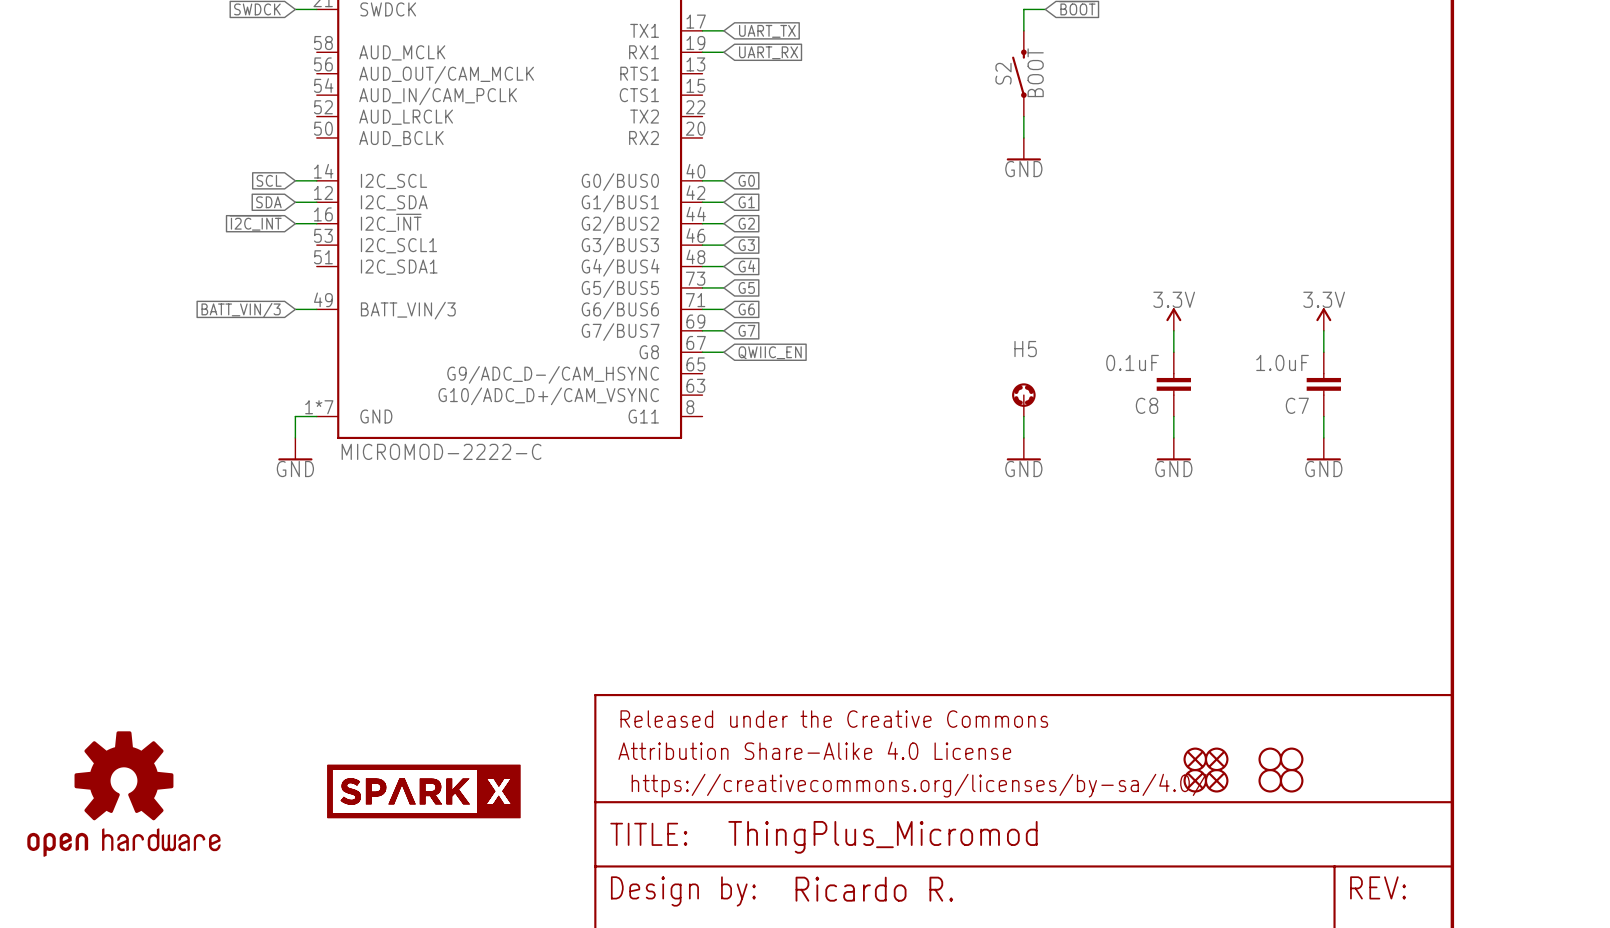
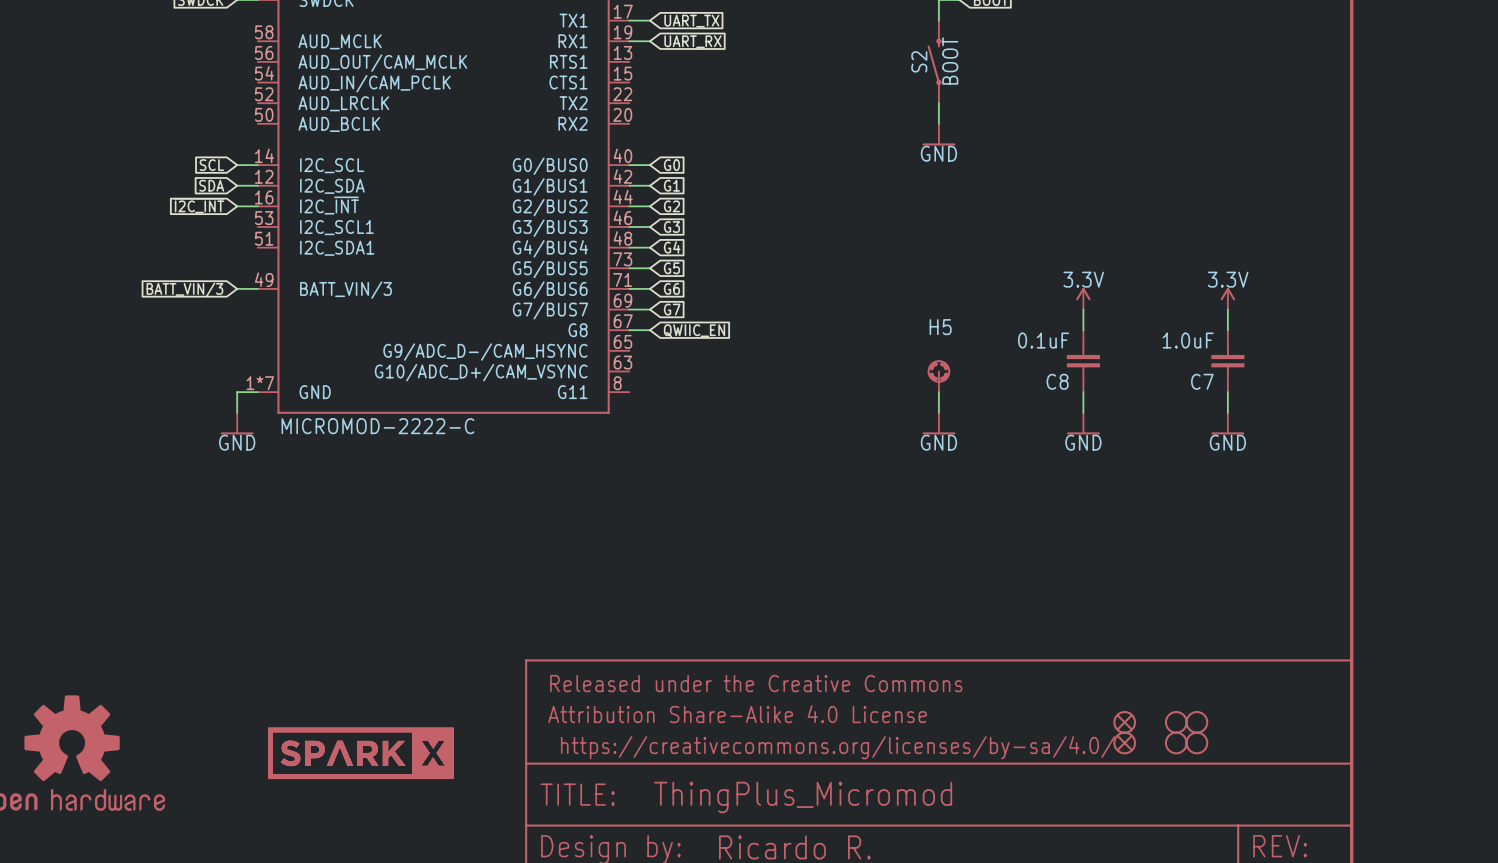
part: (1195, 759) -> none
part: (1195, 780) -> none

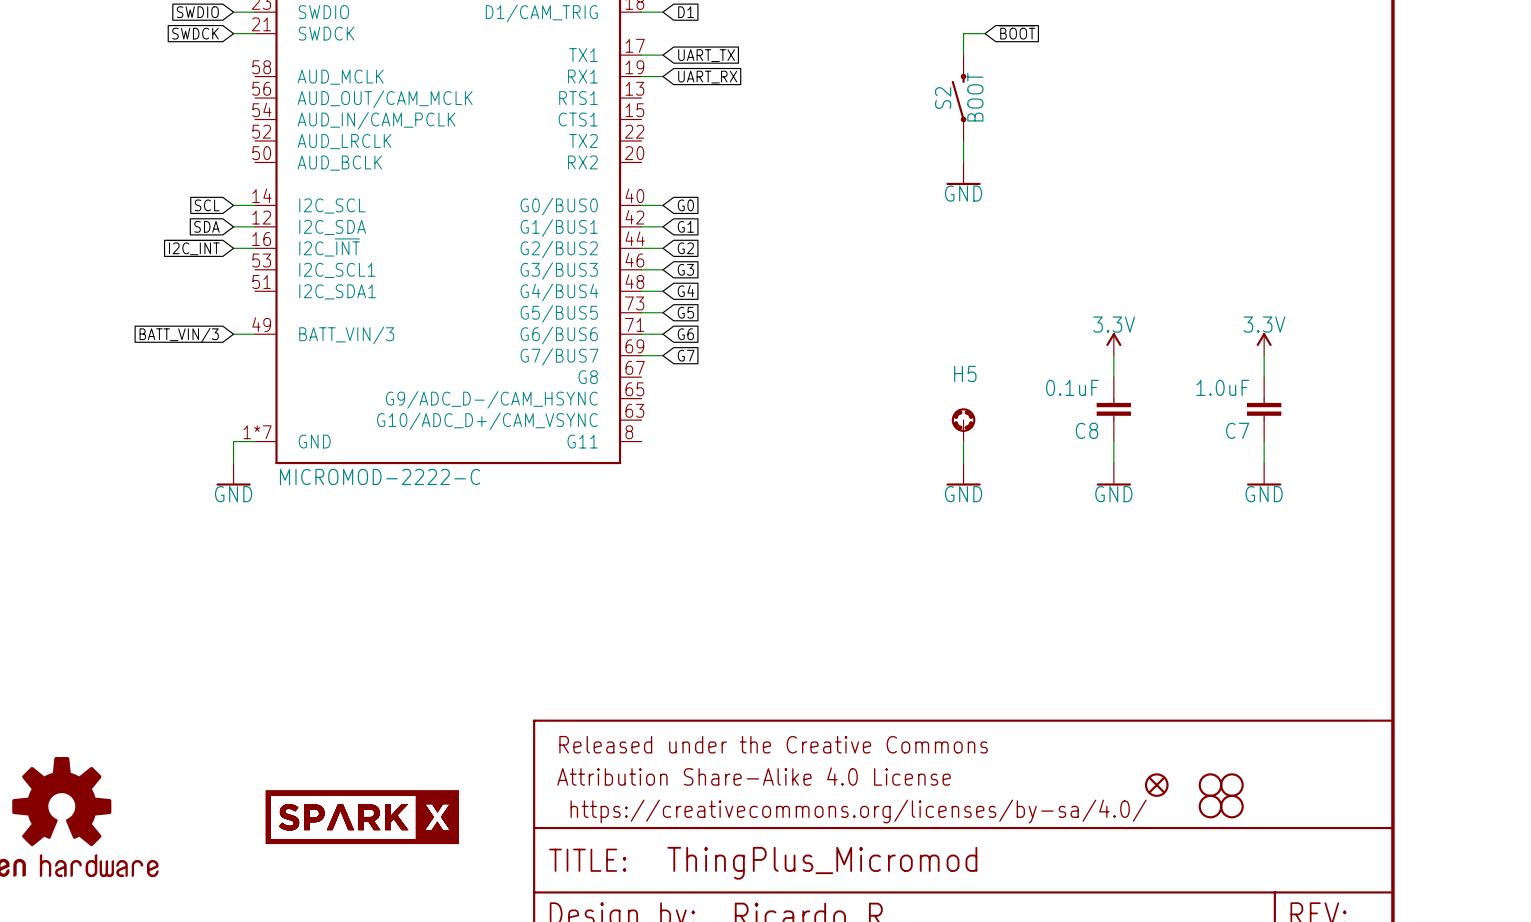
wire: (629, 330) (649, 330) -> none
global label: QWIIC_EN (694, 330) -> none
part: (1124, 743) -> none

